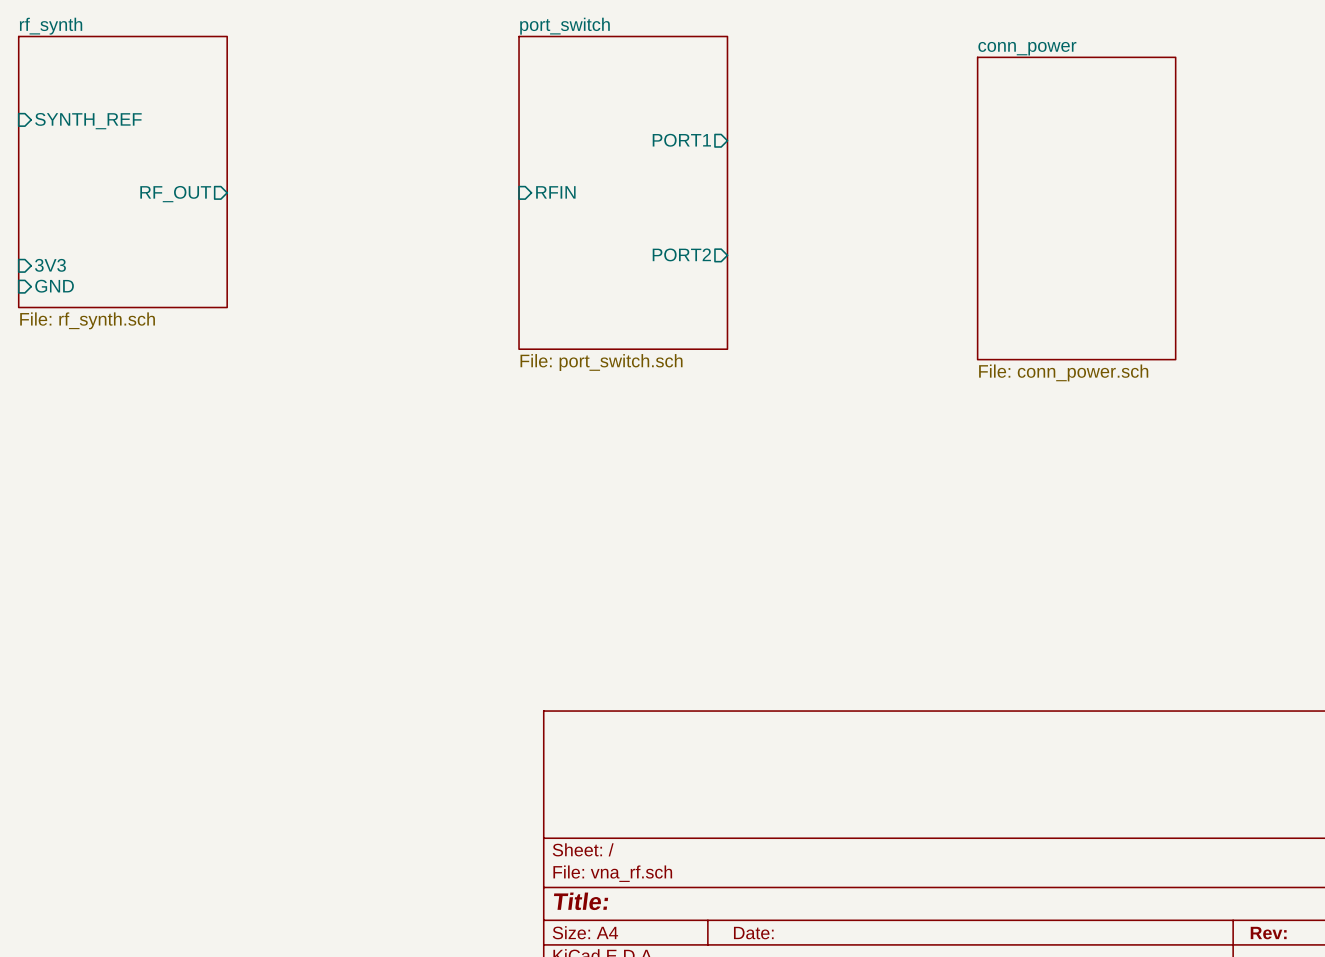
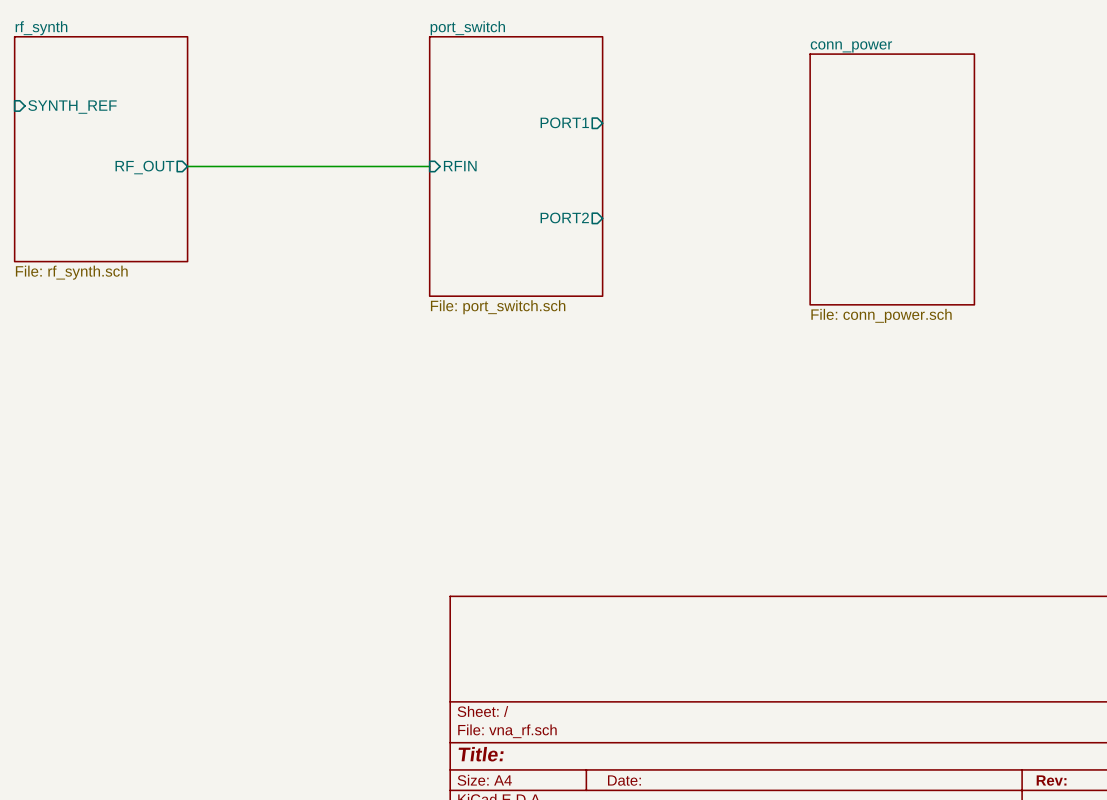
wire: none -> (187, 166) (429, 166)
sheet pin: 3V3 (50, 265) -> none
sheet pin: GND (54, 286) -> none

